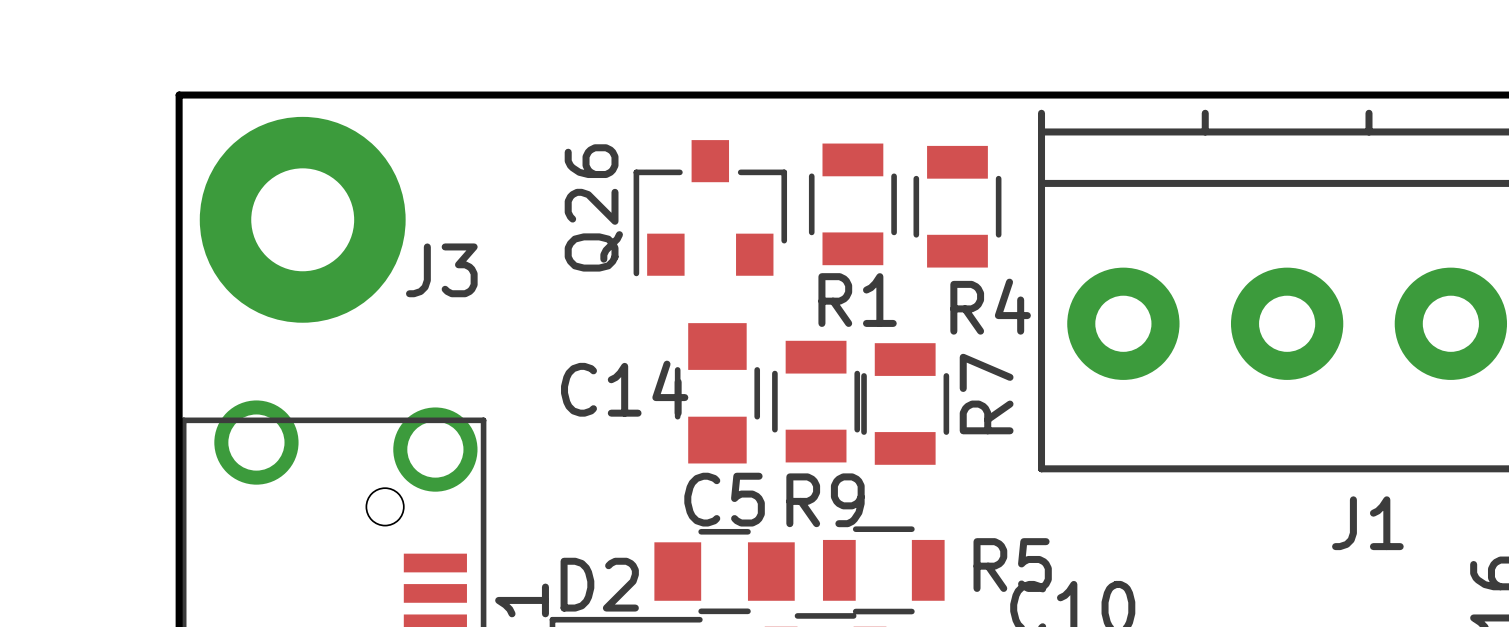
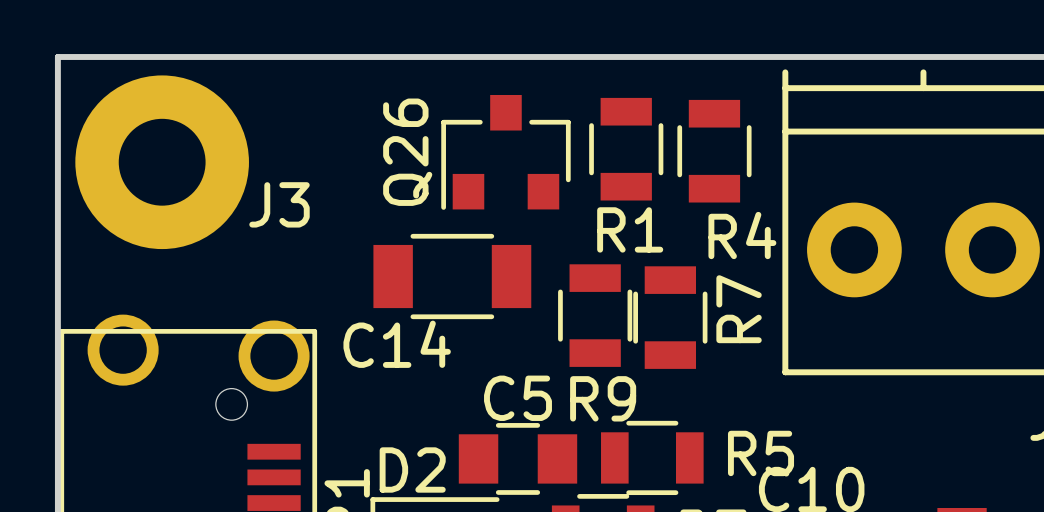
C14 footprint: [674, 323, 761, 464] -> [373, 233, 532, 320]

